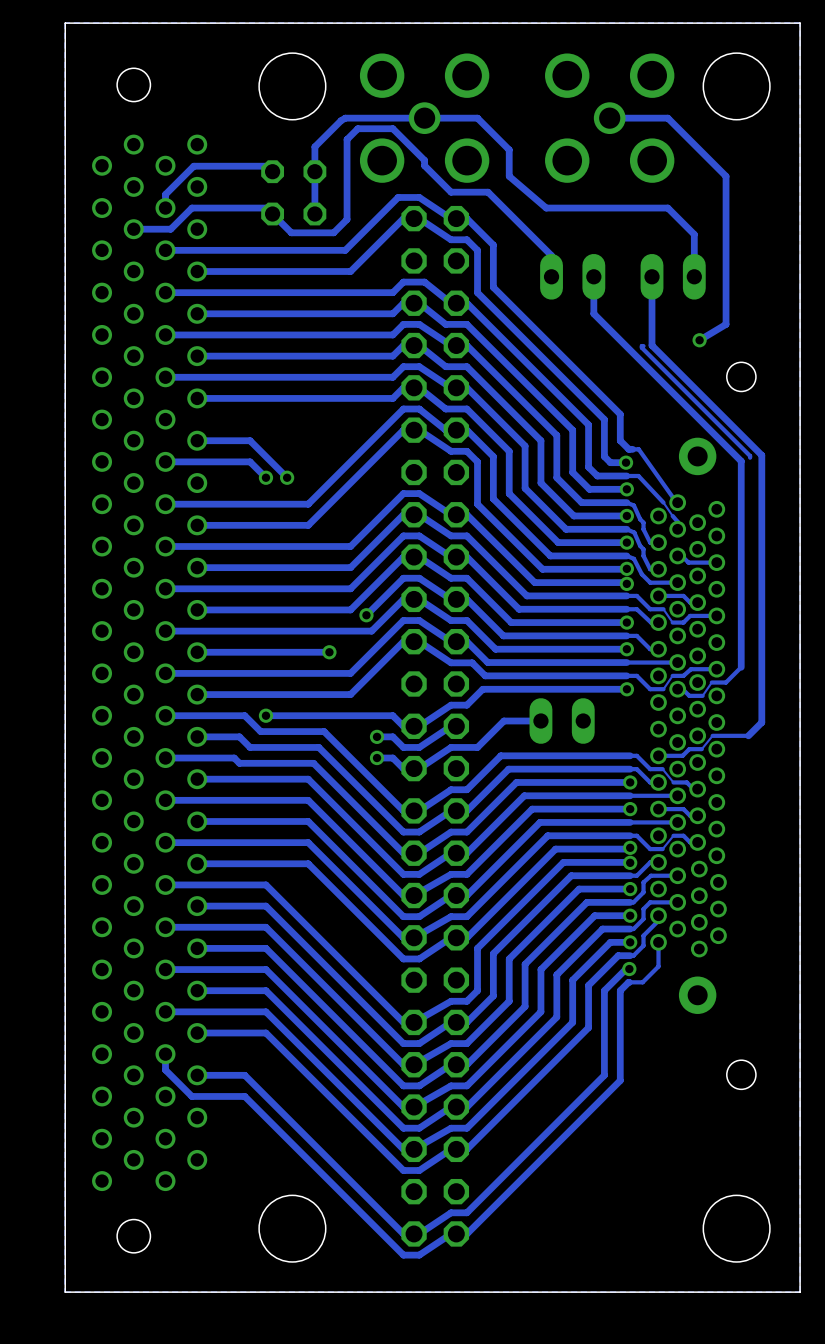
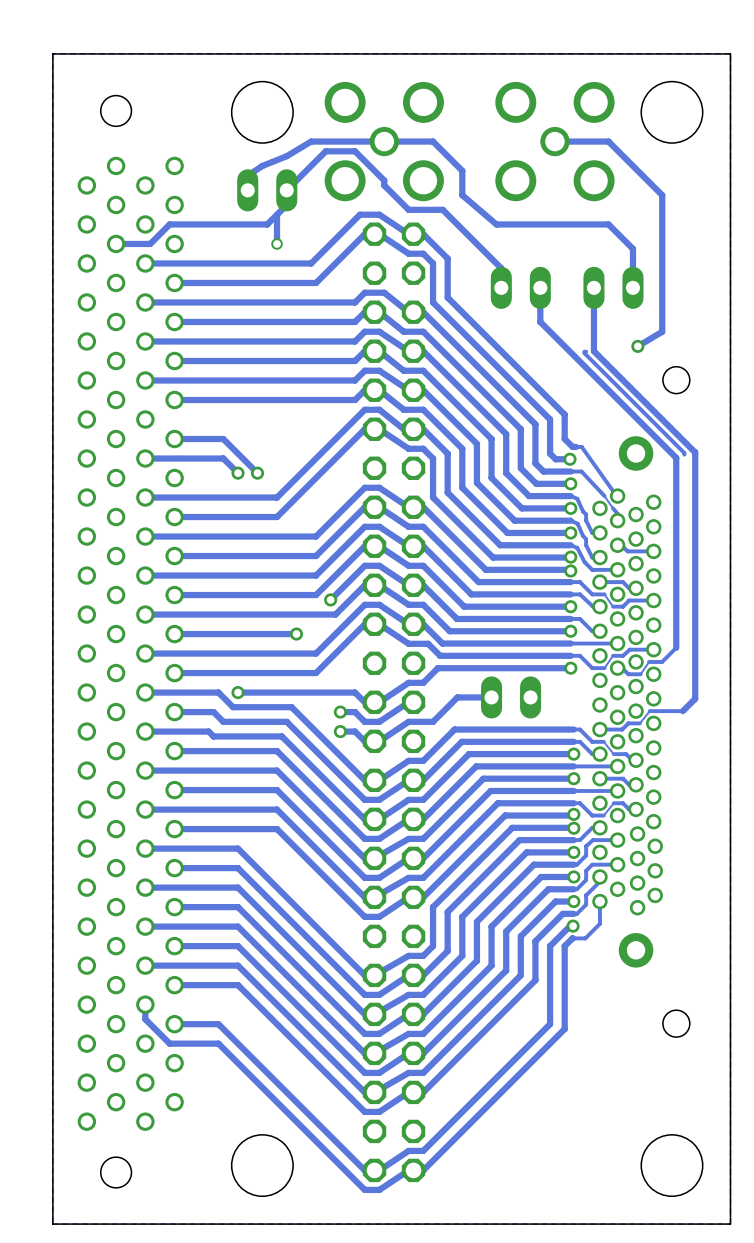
track: (341, 120) (314, 146) (314, 214) -> (307, 143) (286, 156) (262, 165) (247, 175) (247, 190)
track: (361, 128) (357, 128) (347, 139) (347, 219) (333, 232) (291, 232) (266, 208) -> (325, 151) (286, 190) (286, 204) (267, 224) (238, 224)
track: (272, 171) (267, 166) (193, 166) (165, 194) (165, 208) -> none
part: none -> (267, 190)
part: (293, 192) -> none
track: none -> (277, 214) (277, 243)
via: none -> (277, 243)

